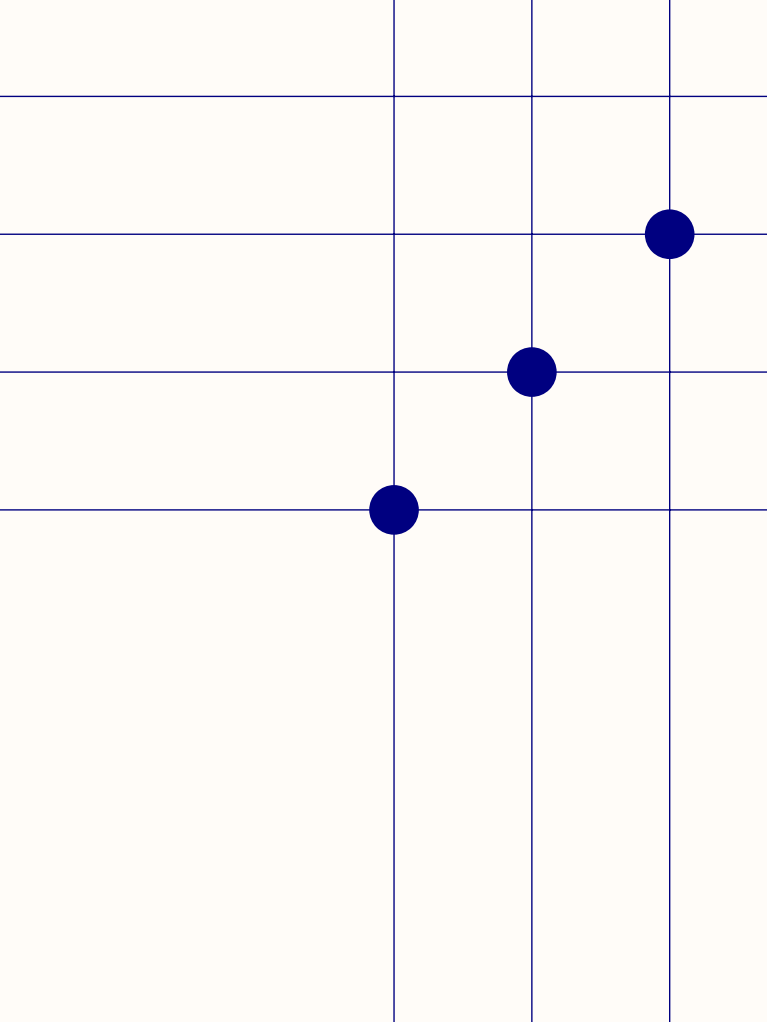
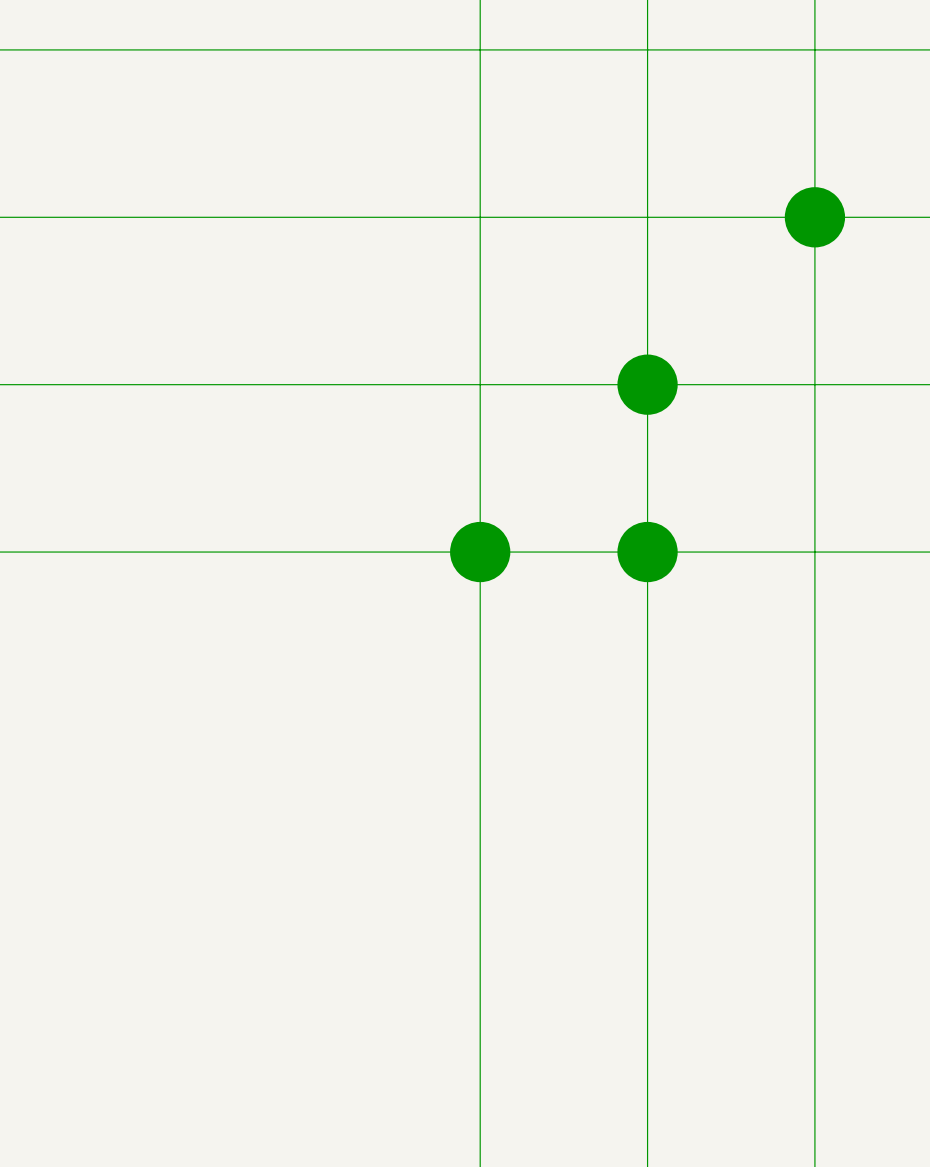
junction: none -> (647, 552)

